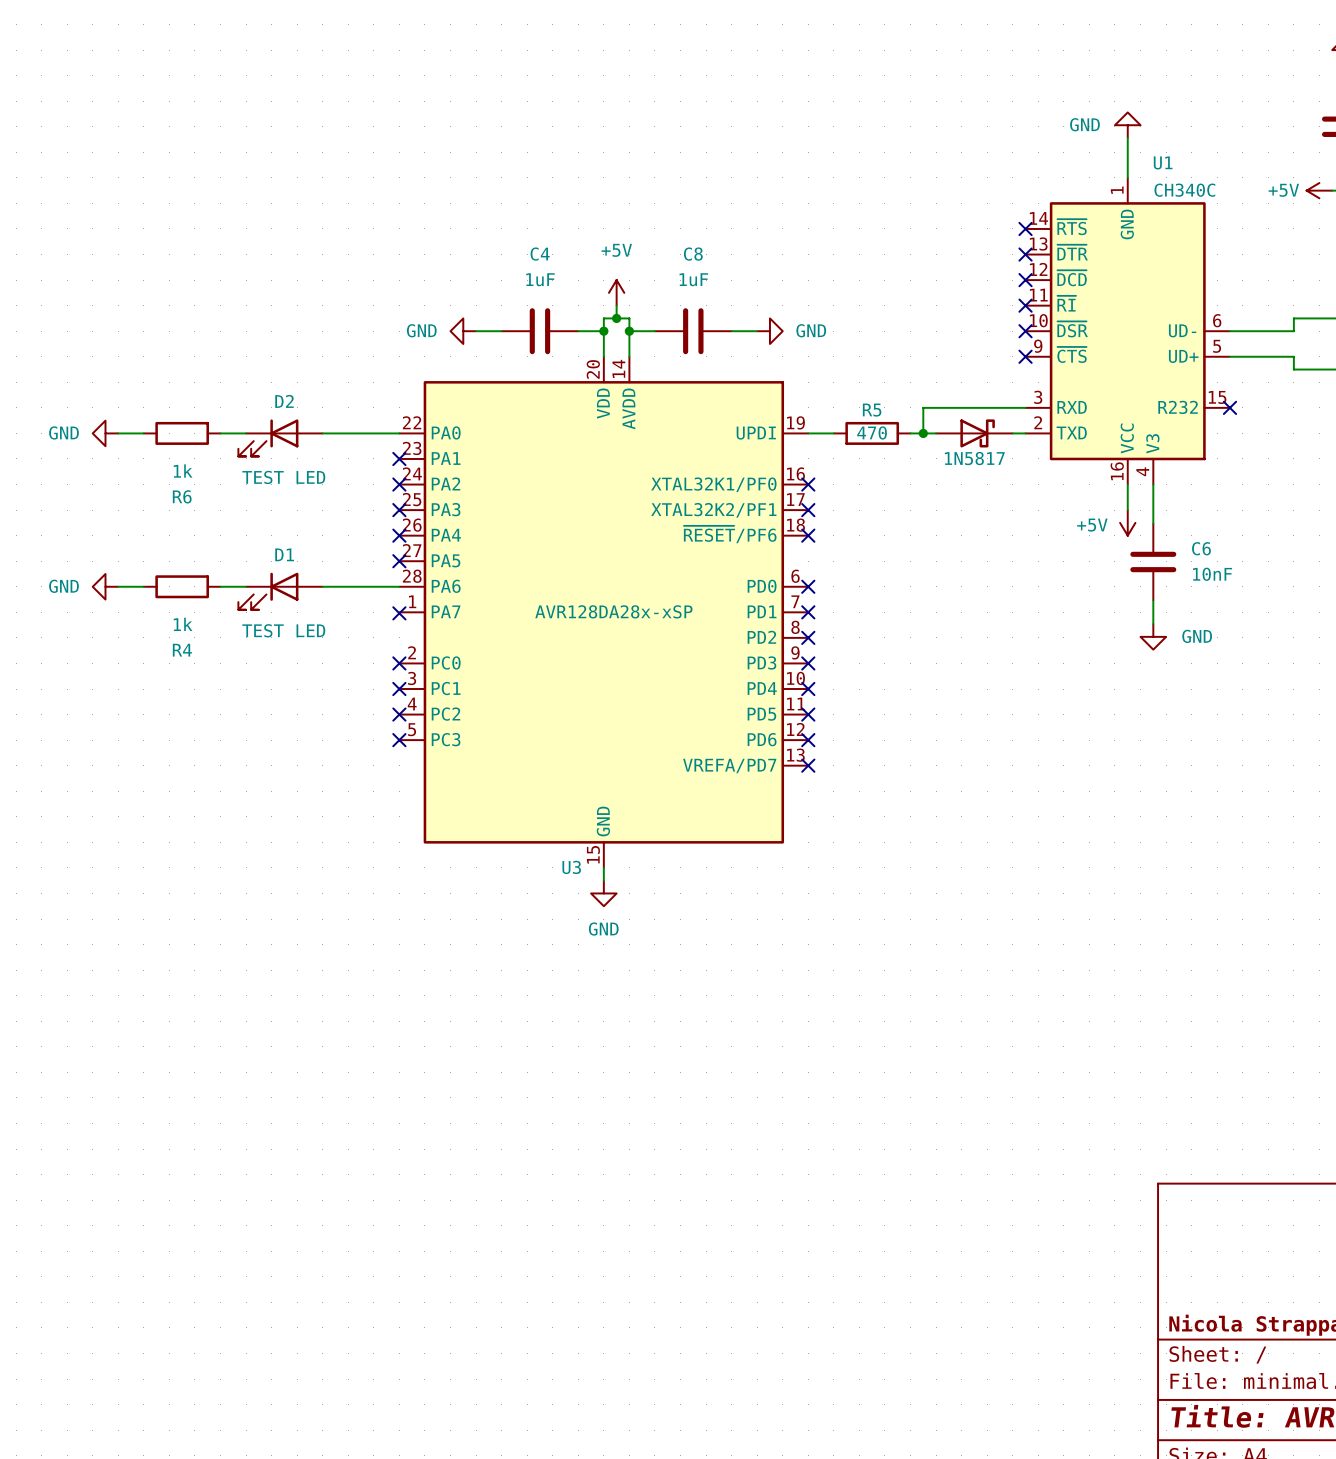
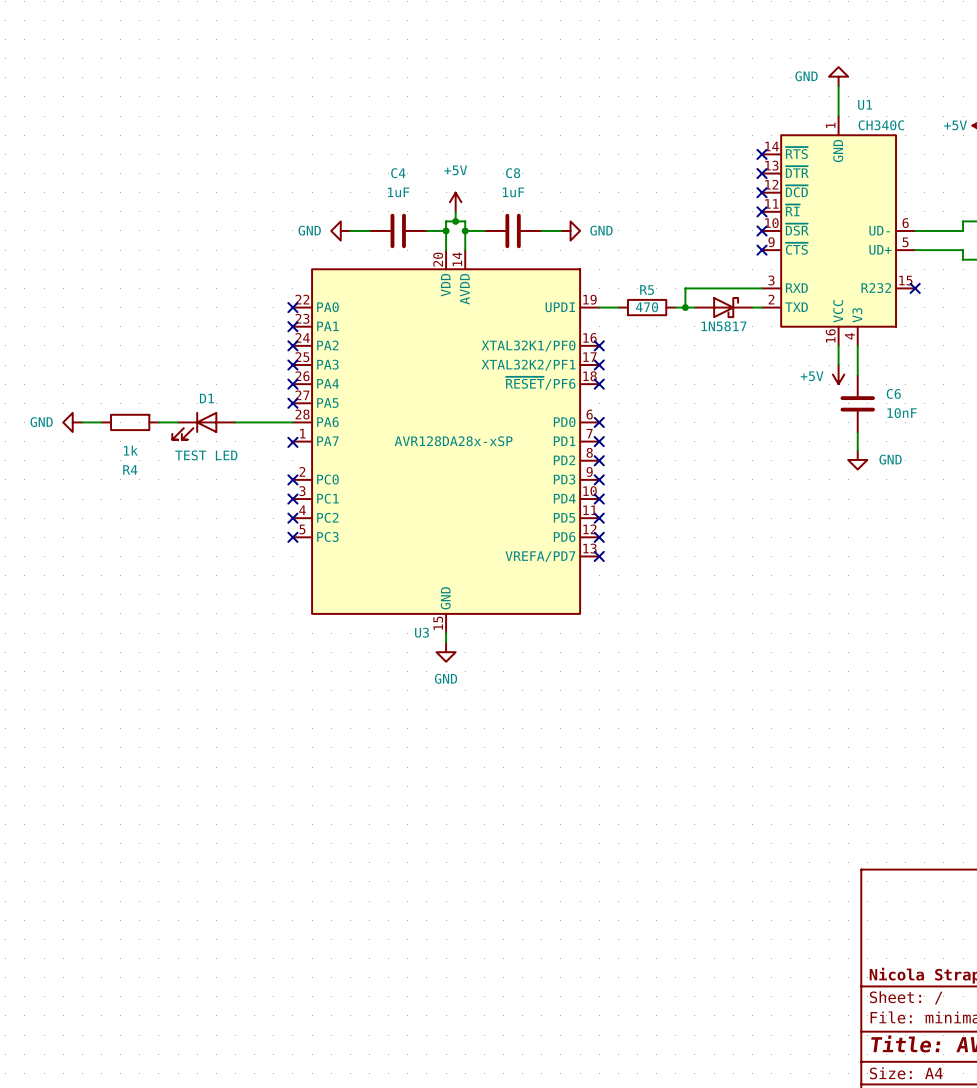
power symbol: GND (105, 433) -> none
wire: (118, 433) (143, 433) -> none
R6: 1k (182, 433) -> none
wire: (220, 433) (246, 433) -> none
wire: (322, 433) (399, 433) -> none
no-connect mark: none -> (292, 307)
D2: TEST LED (280, 437) -> none

